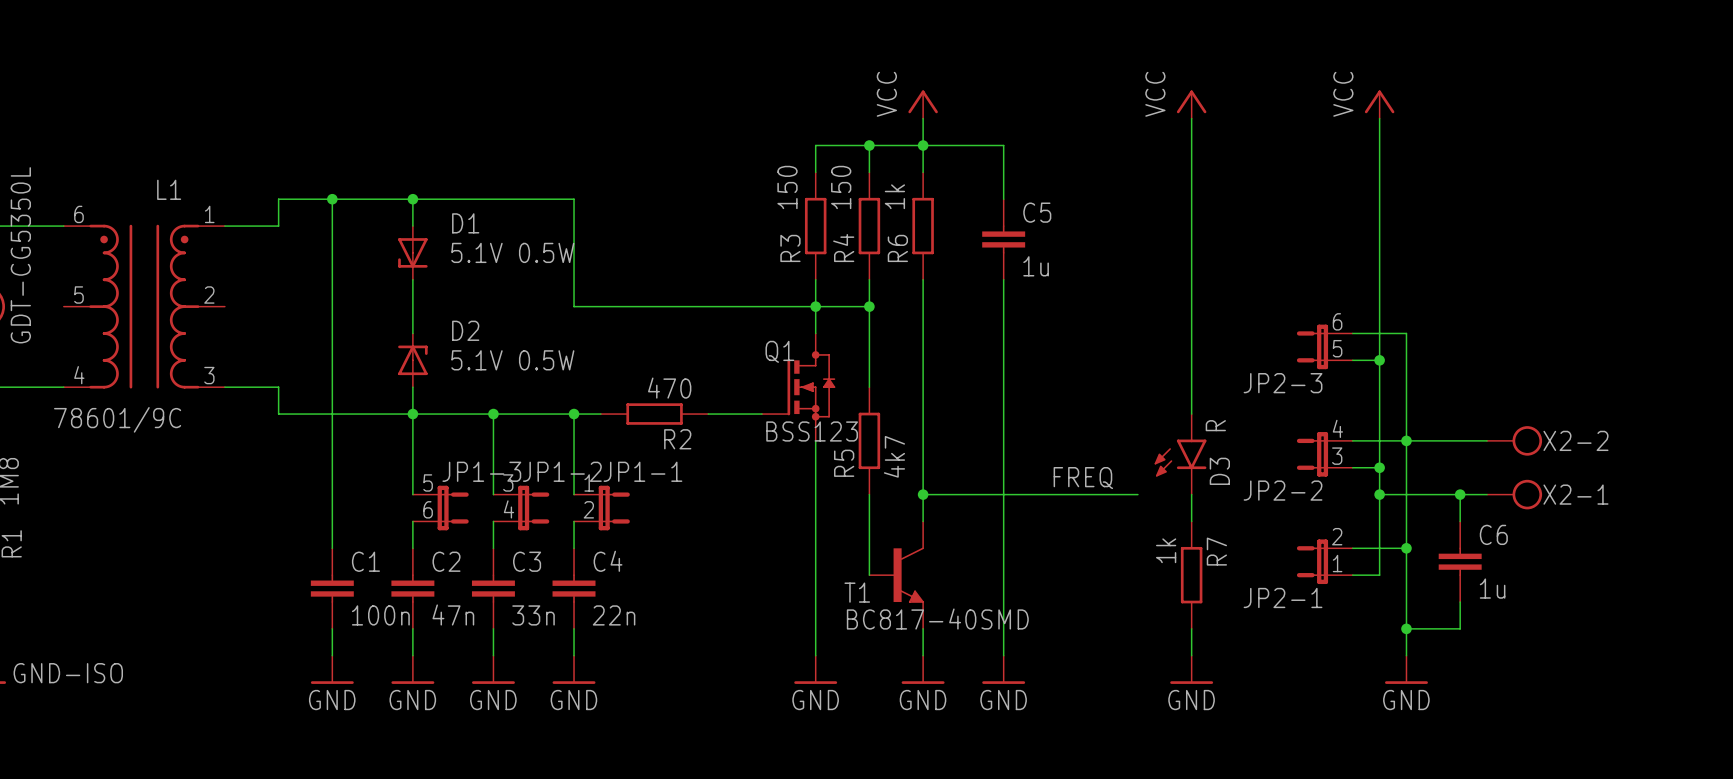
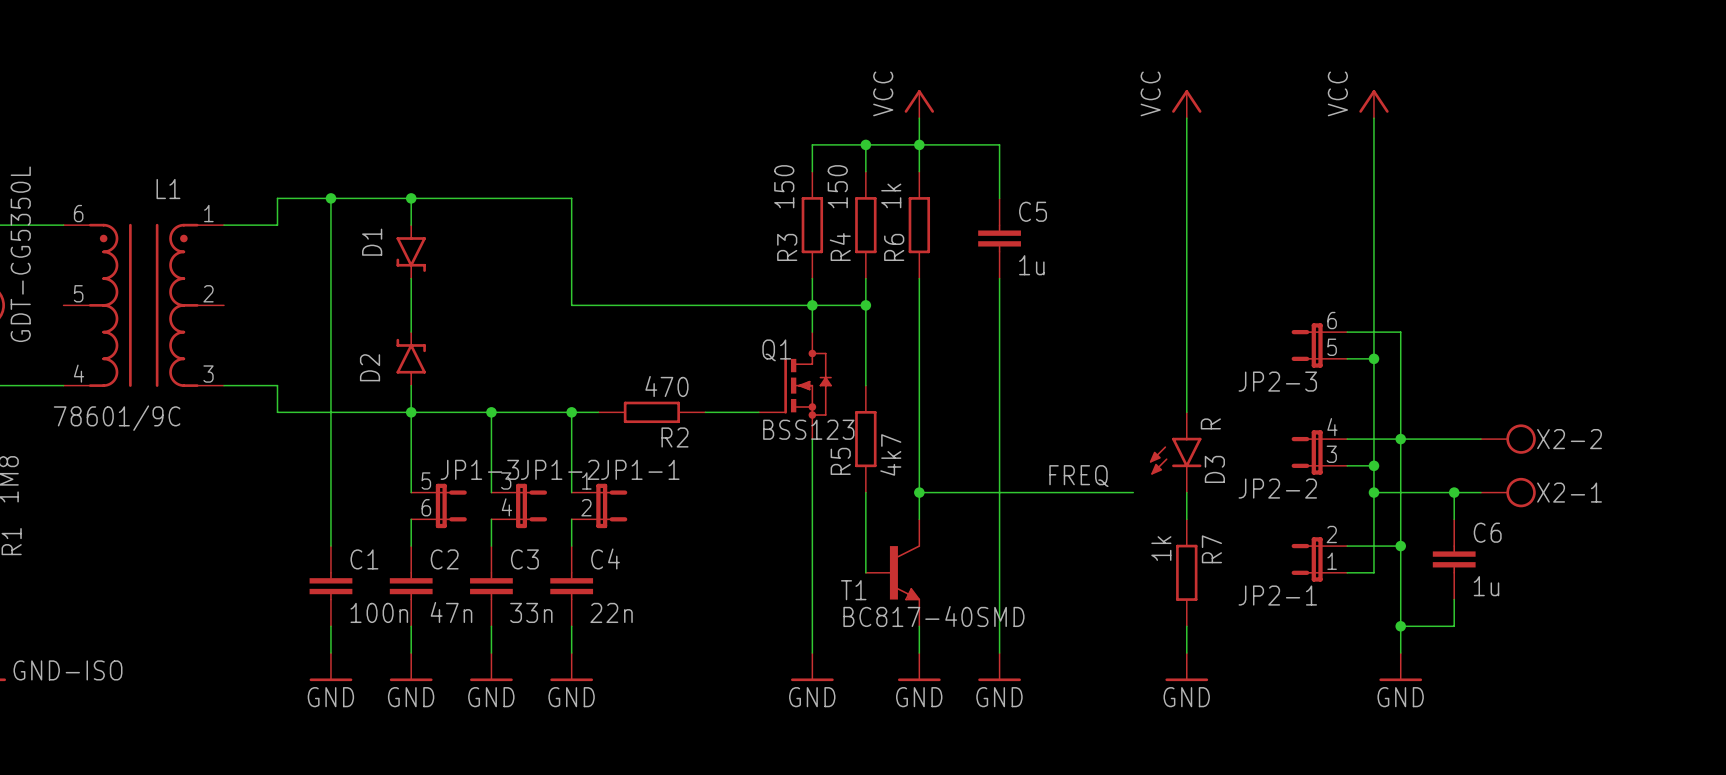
D1 name position: D1 (465, 223) -> D1 (372, 242)
D1 symbol: [398, 226, 428, 280] -> [396, 224, 426, 280]
D1 value: 5.1V 0.5W (512, 252) -> none
D2 name position: D2 (465, 330) -> D2 (370, 367)
D2 symbol: [398, 333, 428, 388] -> [396, 331, 426, 387]
D2 value: 5.1V 0.5W (512, 360) -> none

